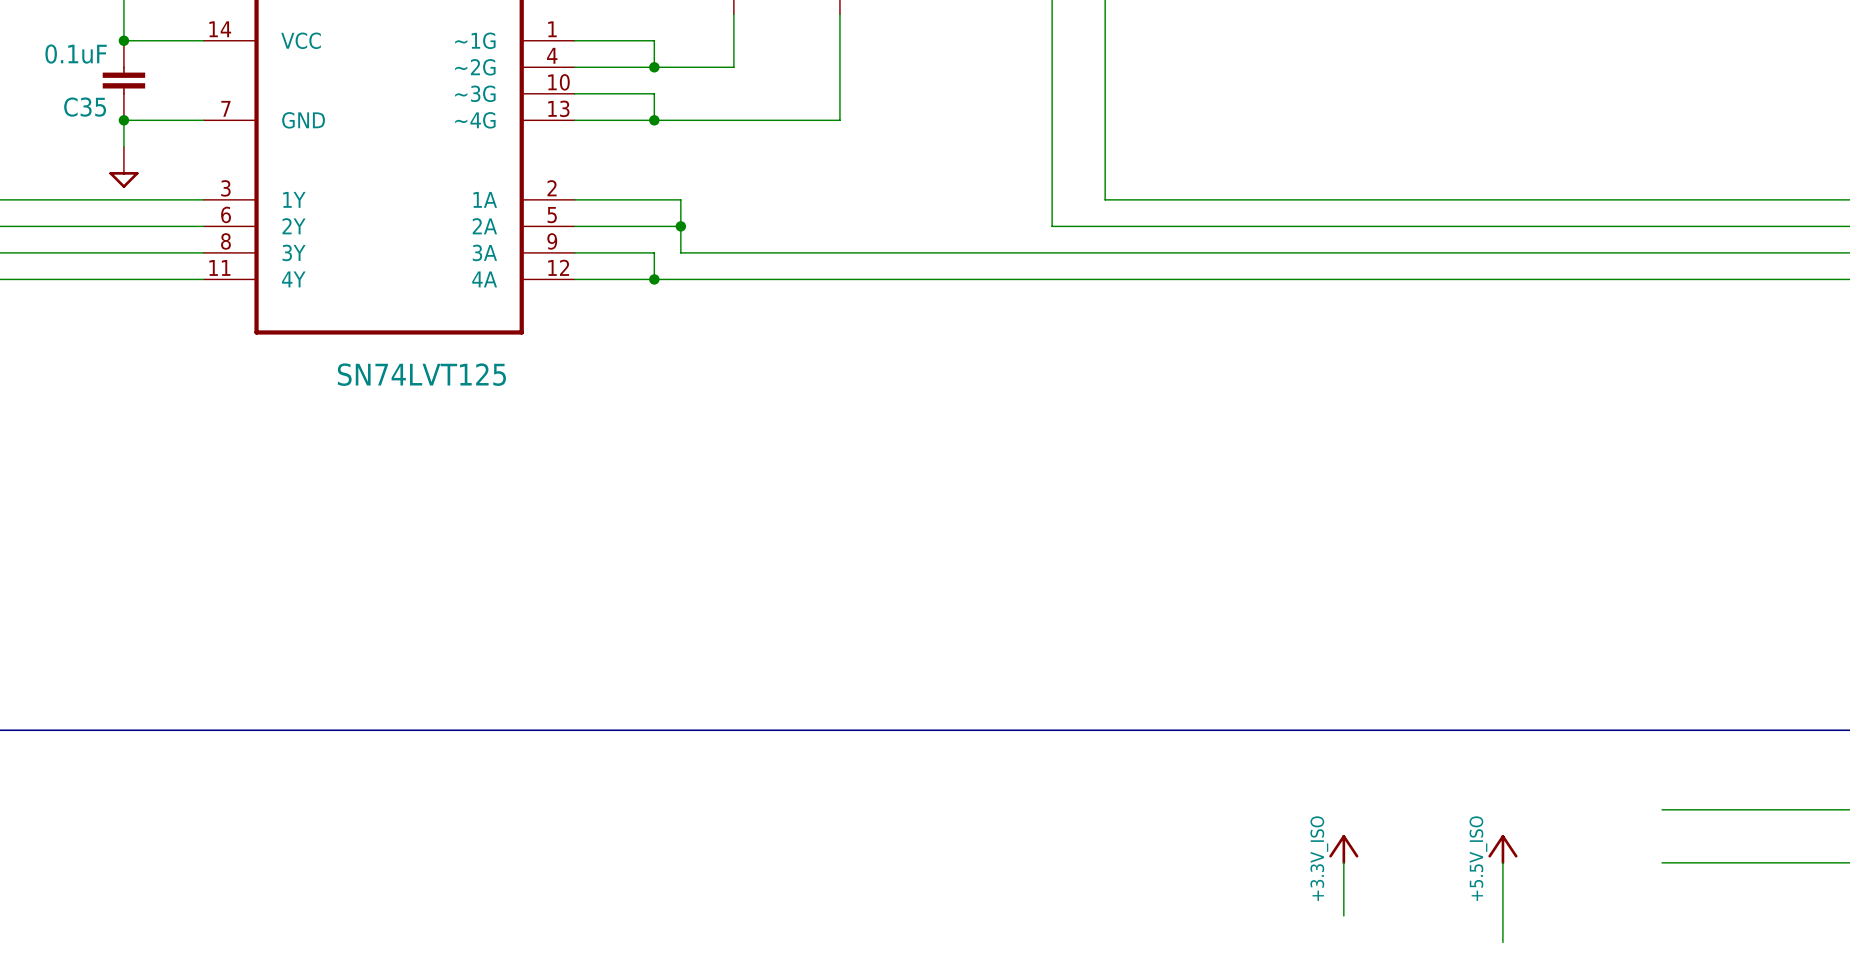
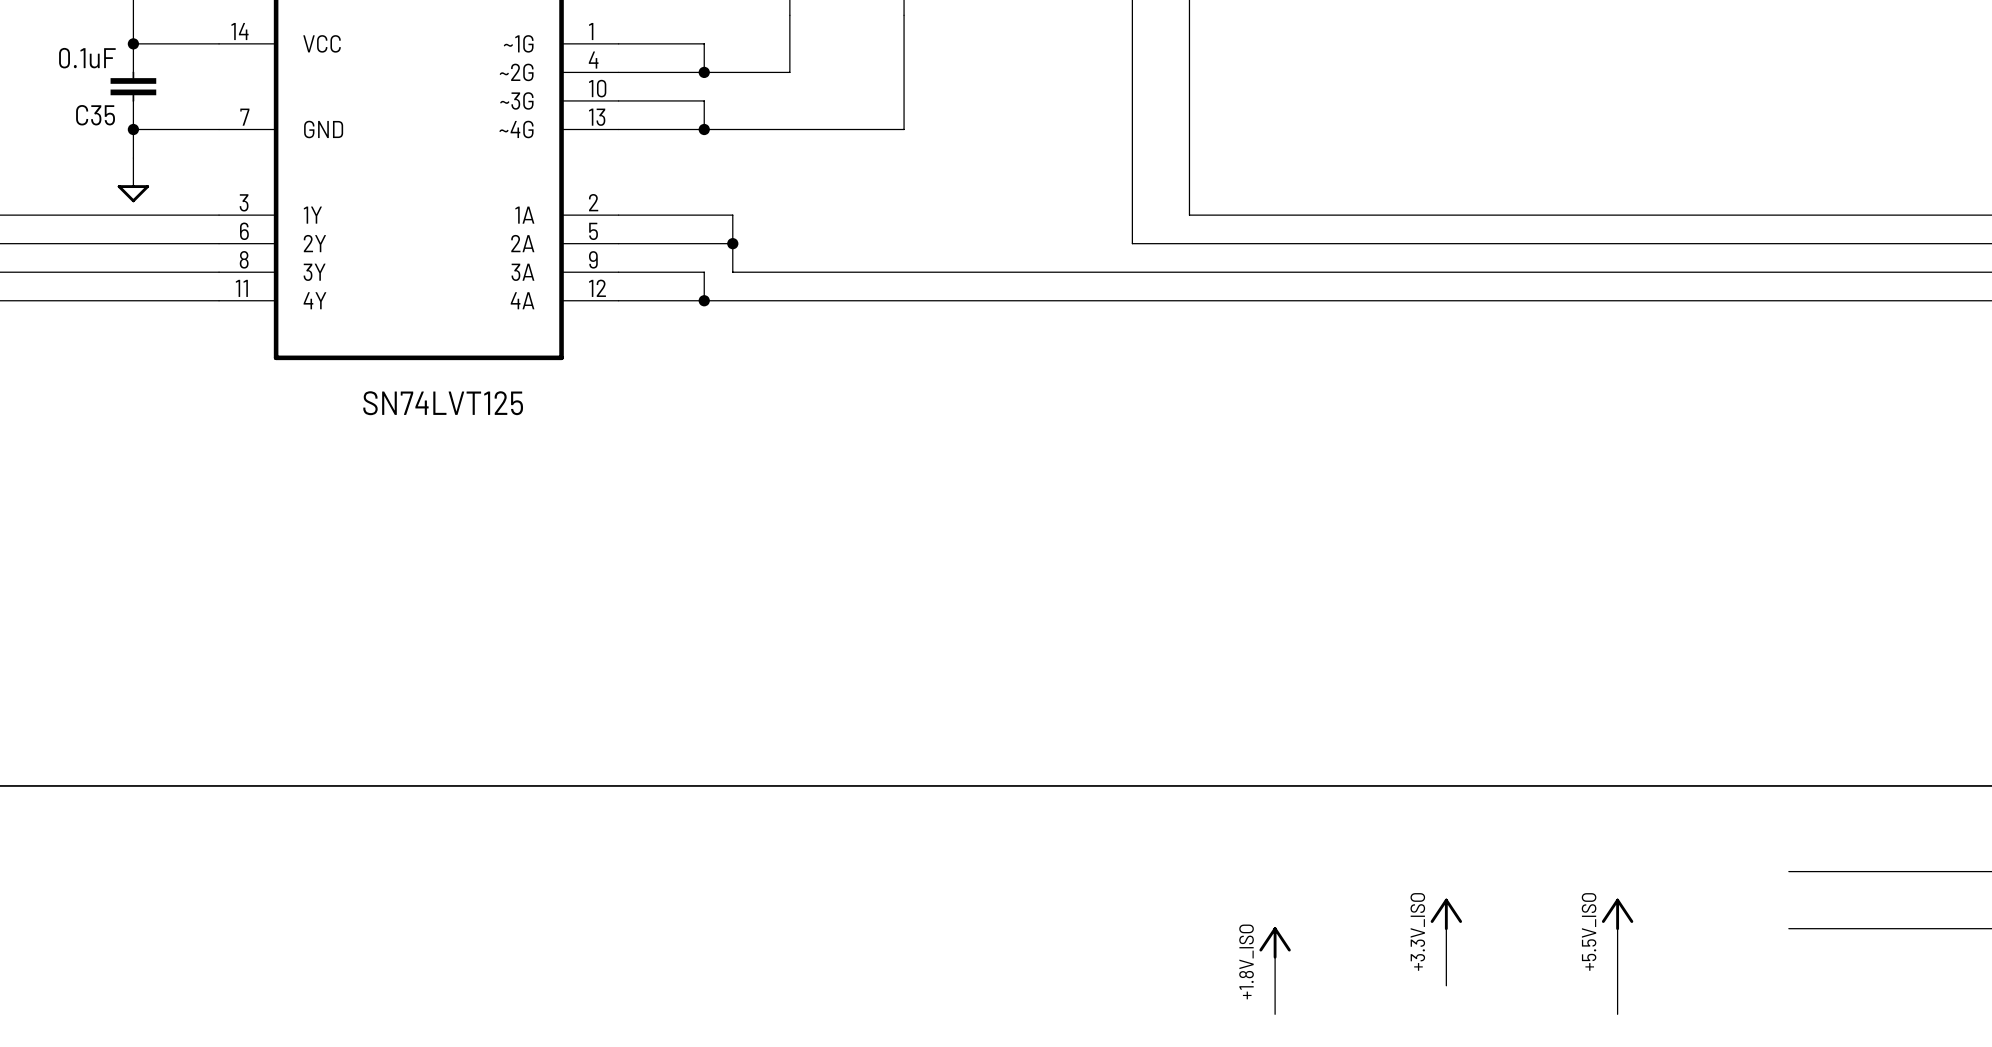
part: none -> +1.8V_ISO (1275, 942)
wire: none -> (1275, 957) (1275, 1014)

